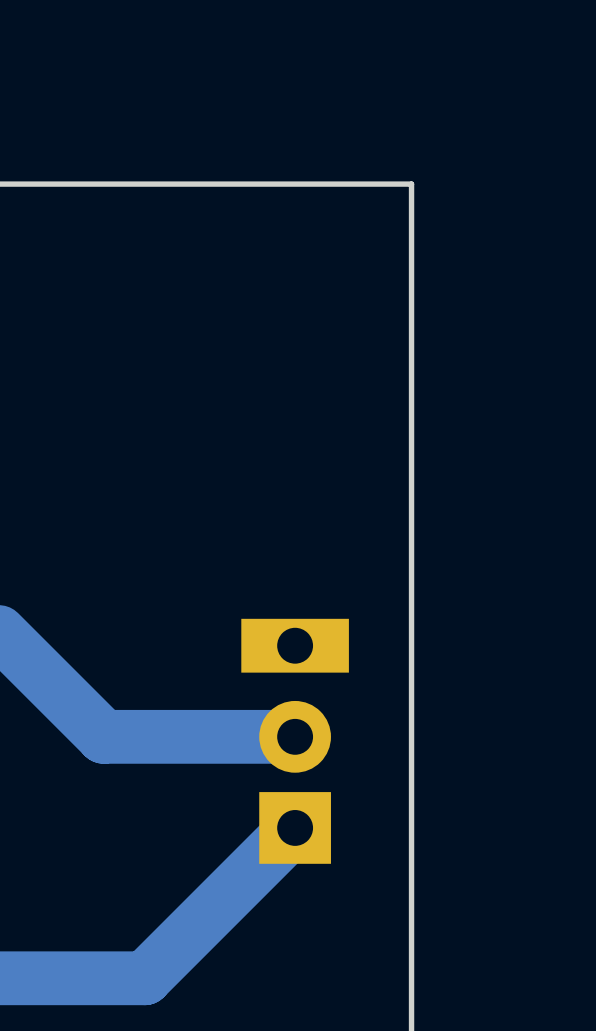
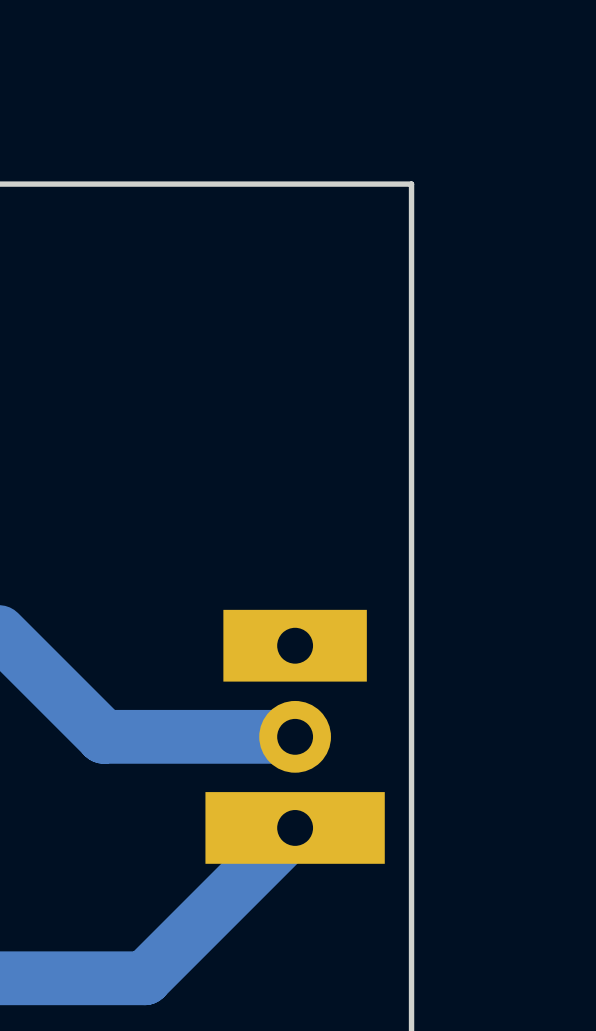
part footprint: [241, 618, 349, 864] -> [205, 609, 385, 864]

